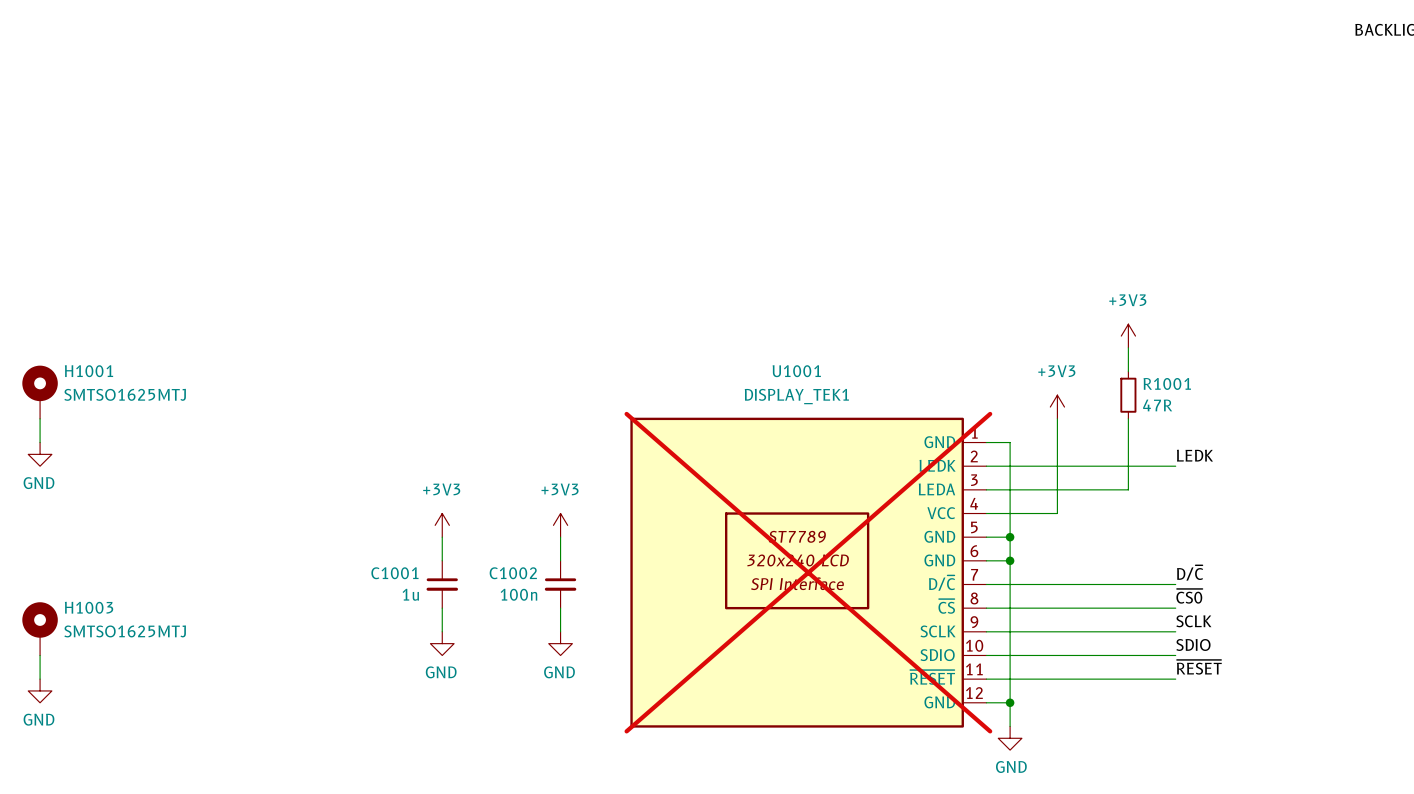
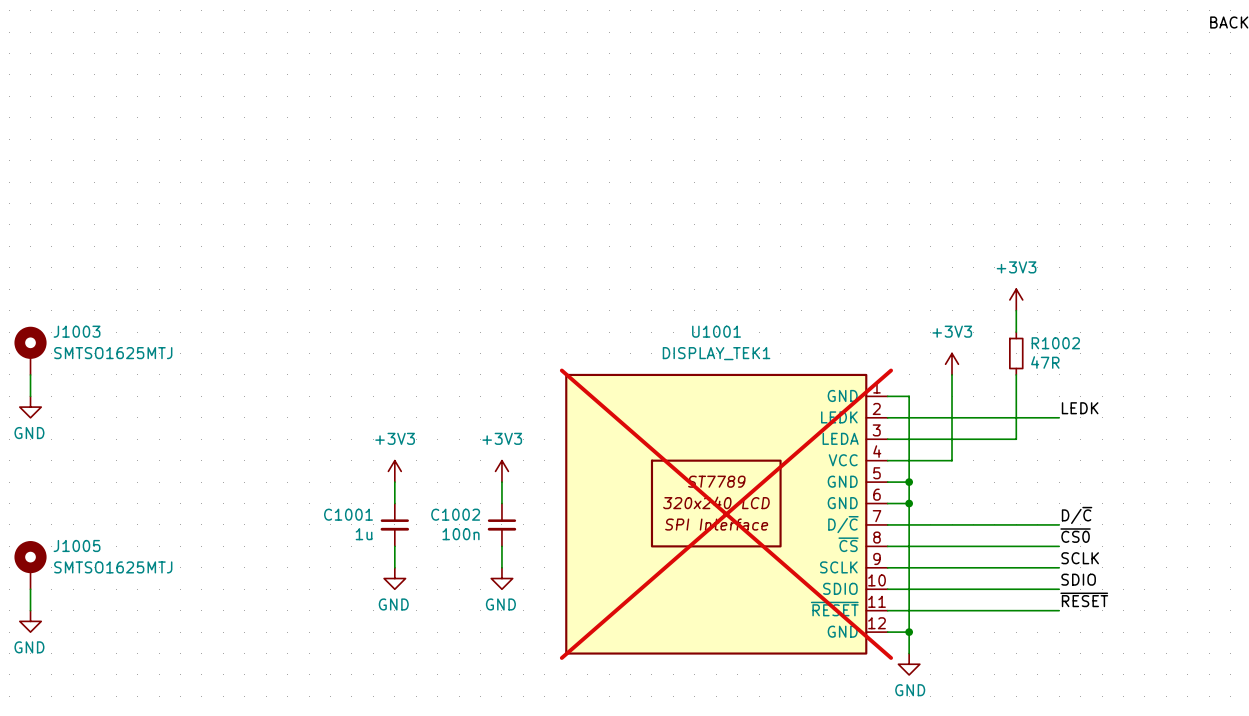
H1001 name: H1001 (89, 371) -> J1003 (77, 331)
R1001 name: R1001 (1167, 383) -> R1002 (1055, 343)
H1003 name: H1003 (89, 607) -> J1005 (77, 545)

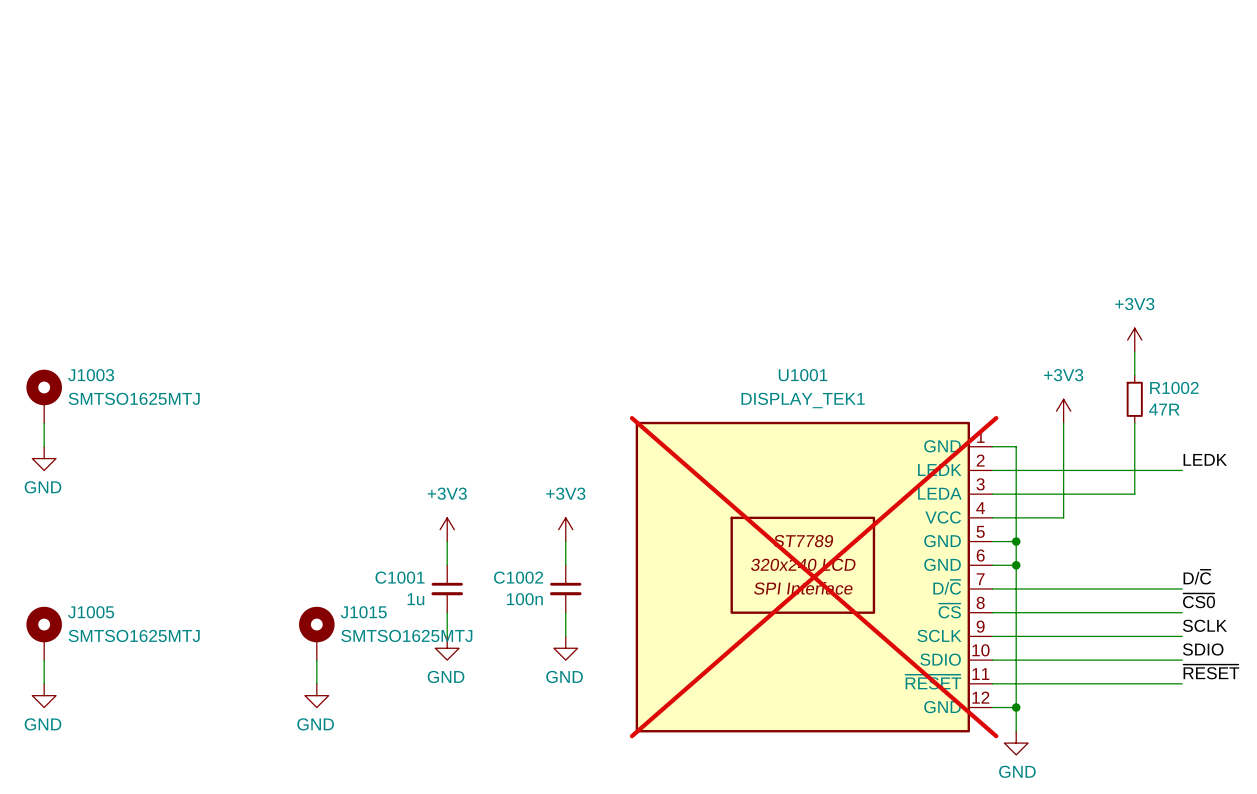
J1015: none -> SMTSO1625MTJ (316, 633)
wire: none -> (316, 660) (316, 683)
power symbol: none -> GND (316, 695)

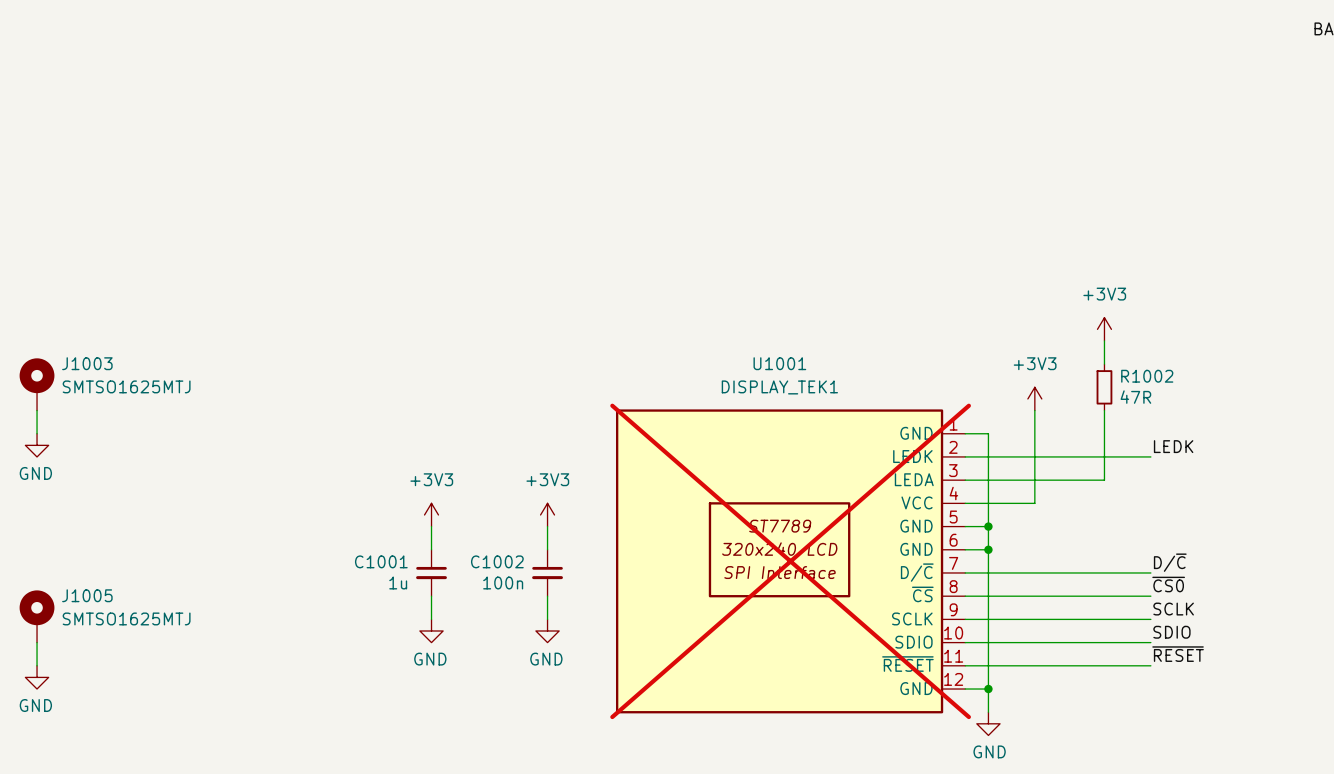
J1015: SMTSO1625MTJ (316, 633) -> none
wire: (316, 660) (316, 683) -> none
power symbol: GND (316, 695) -> none

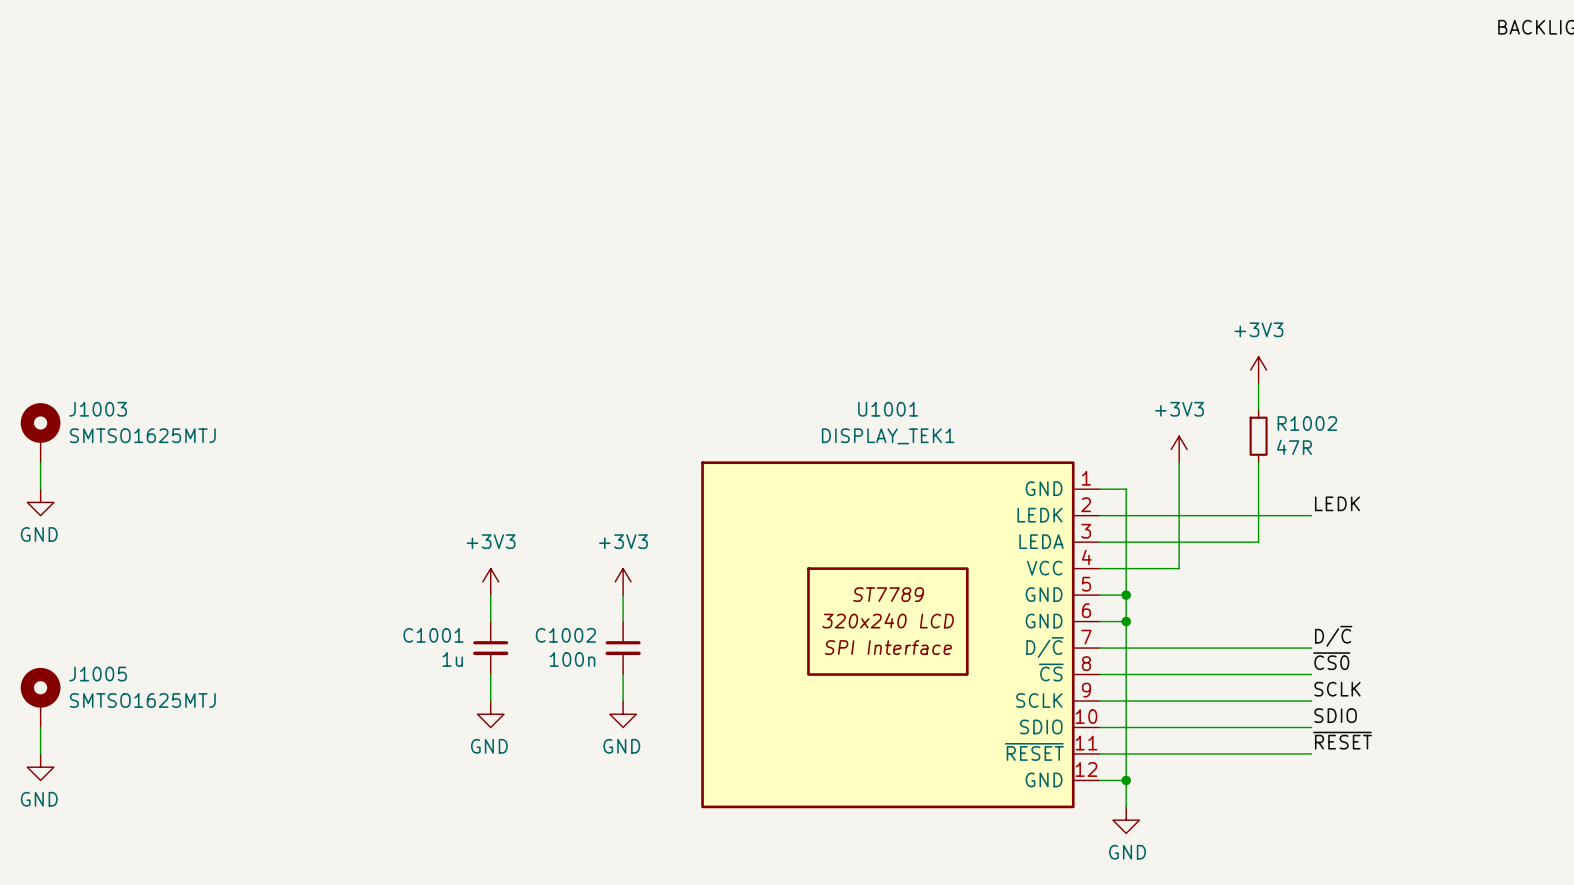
U1001 do-not-place cross: (790, 561) -> none

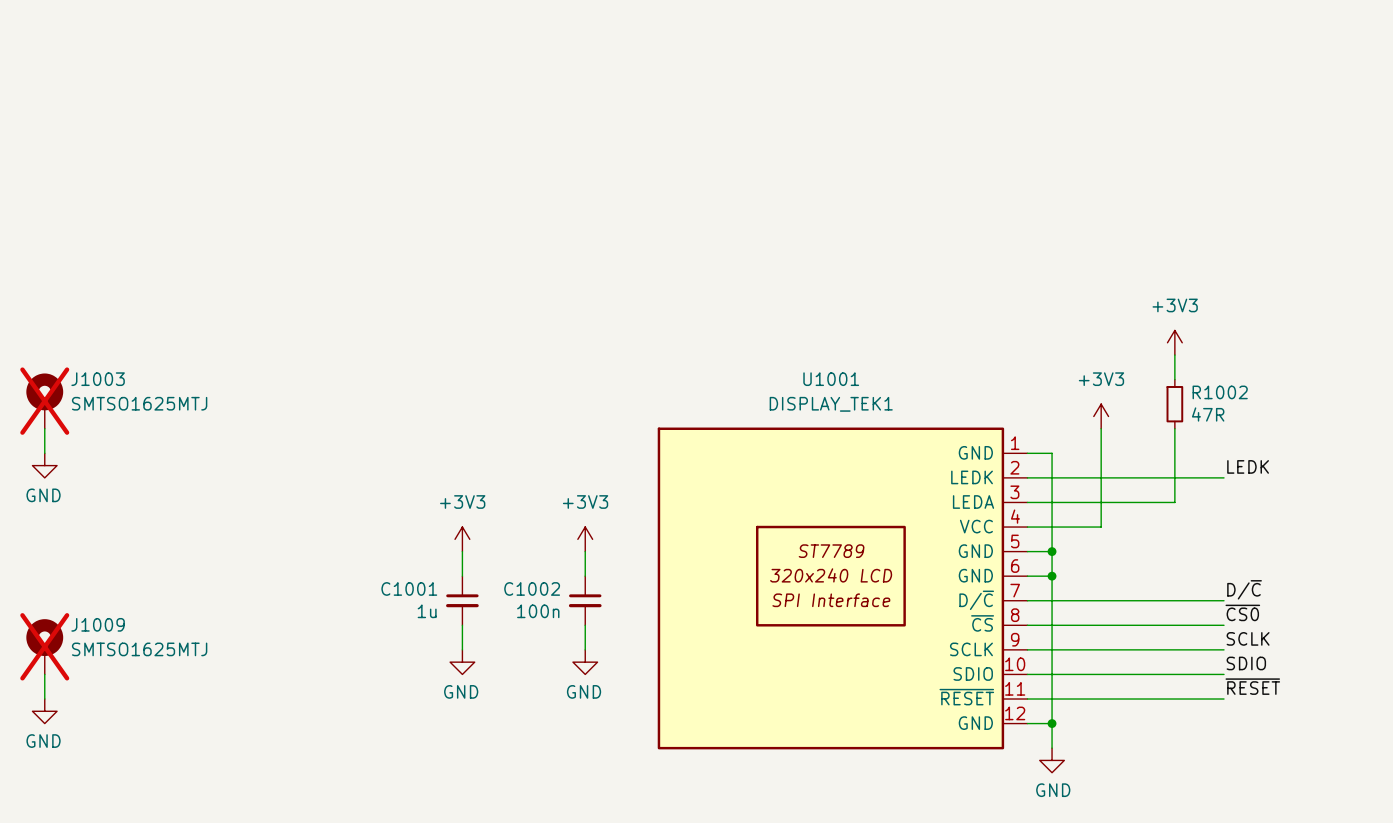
J1003 do-not-place cross: none -> (44, 401)
J1005 name: J1005 (98, 674) -> J1009 (98, 624)
J1005 do-not-place cross: none -> (44, 646)

